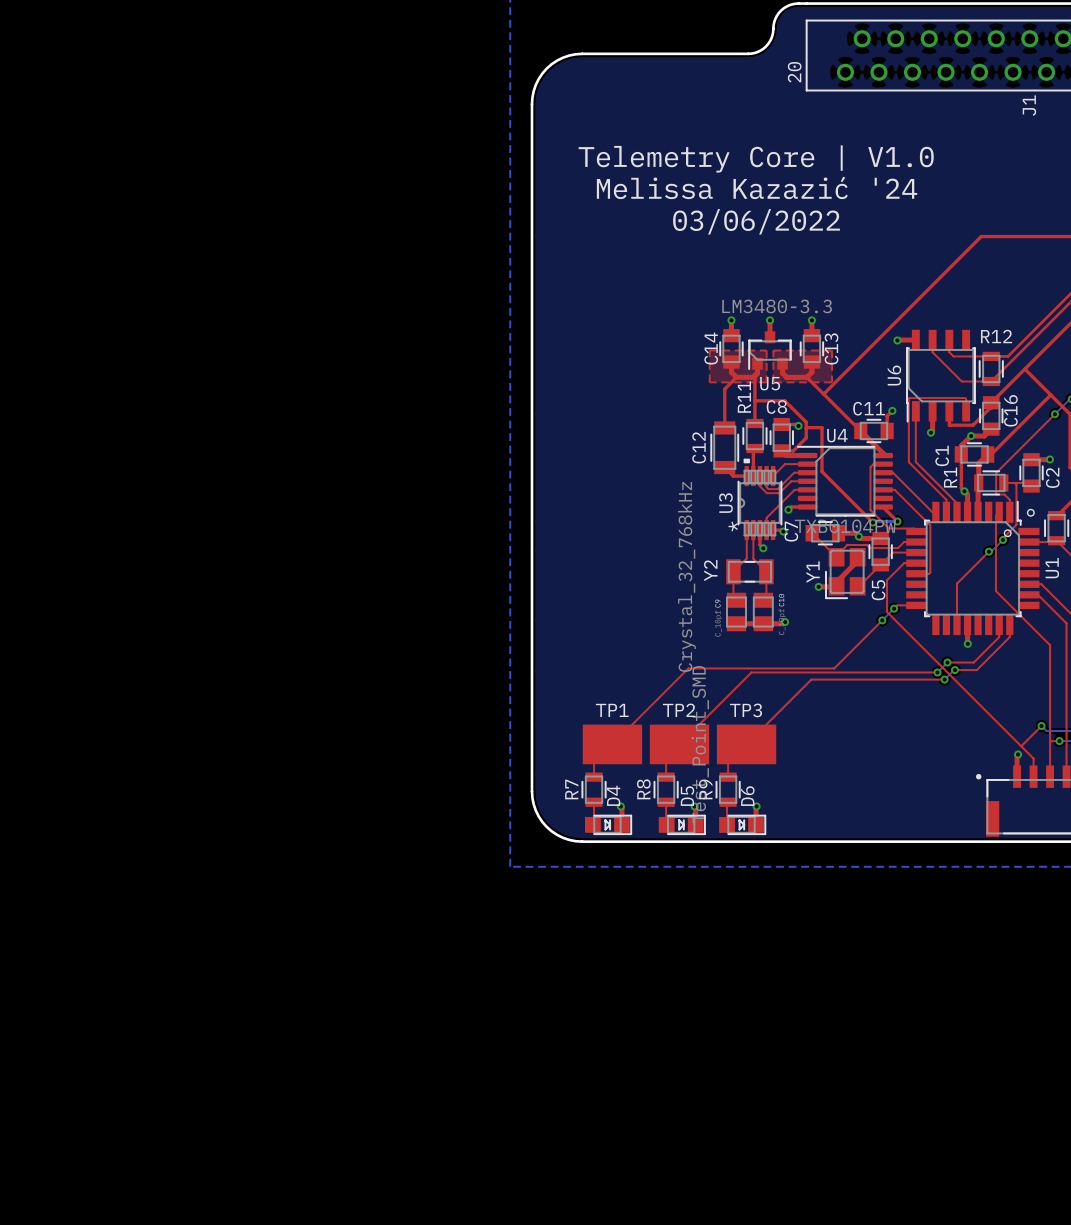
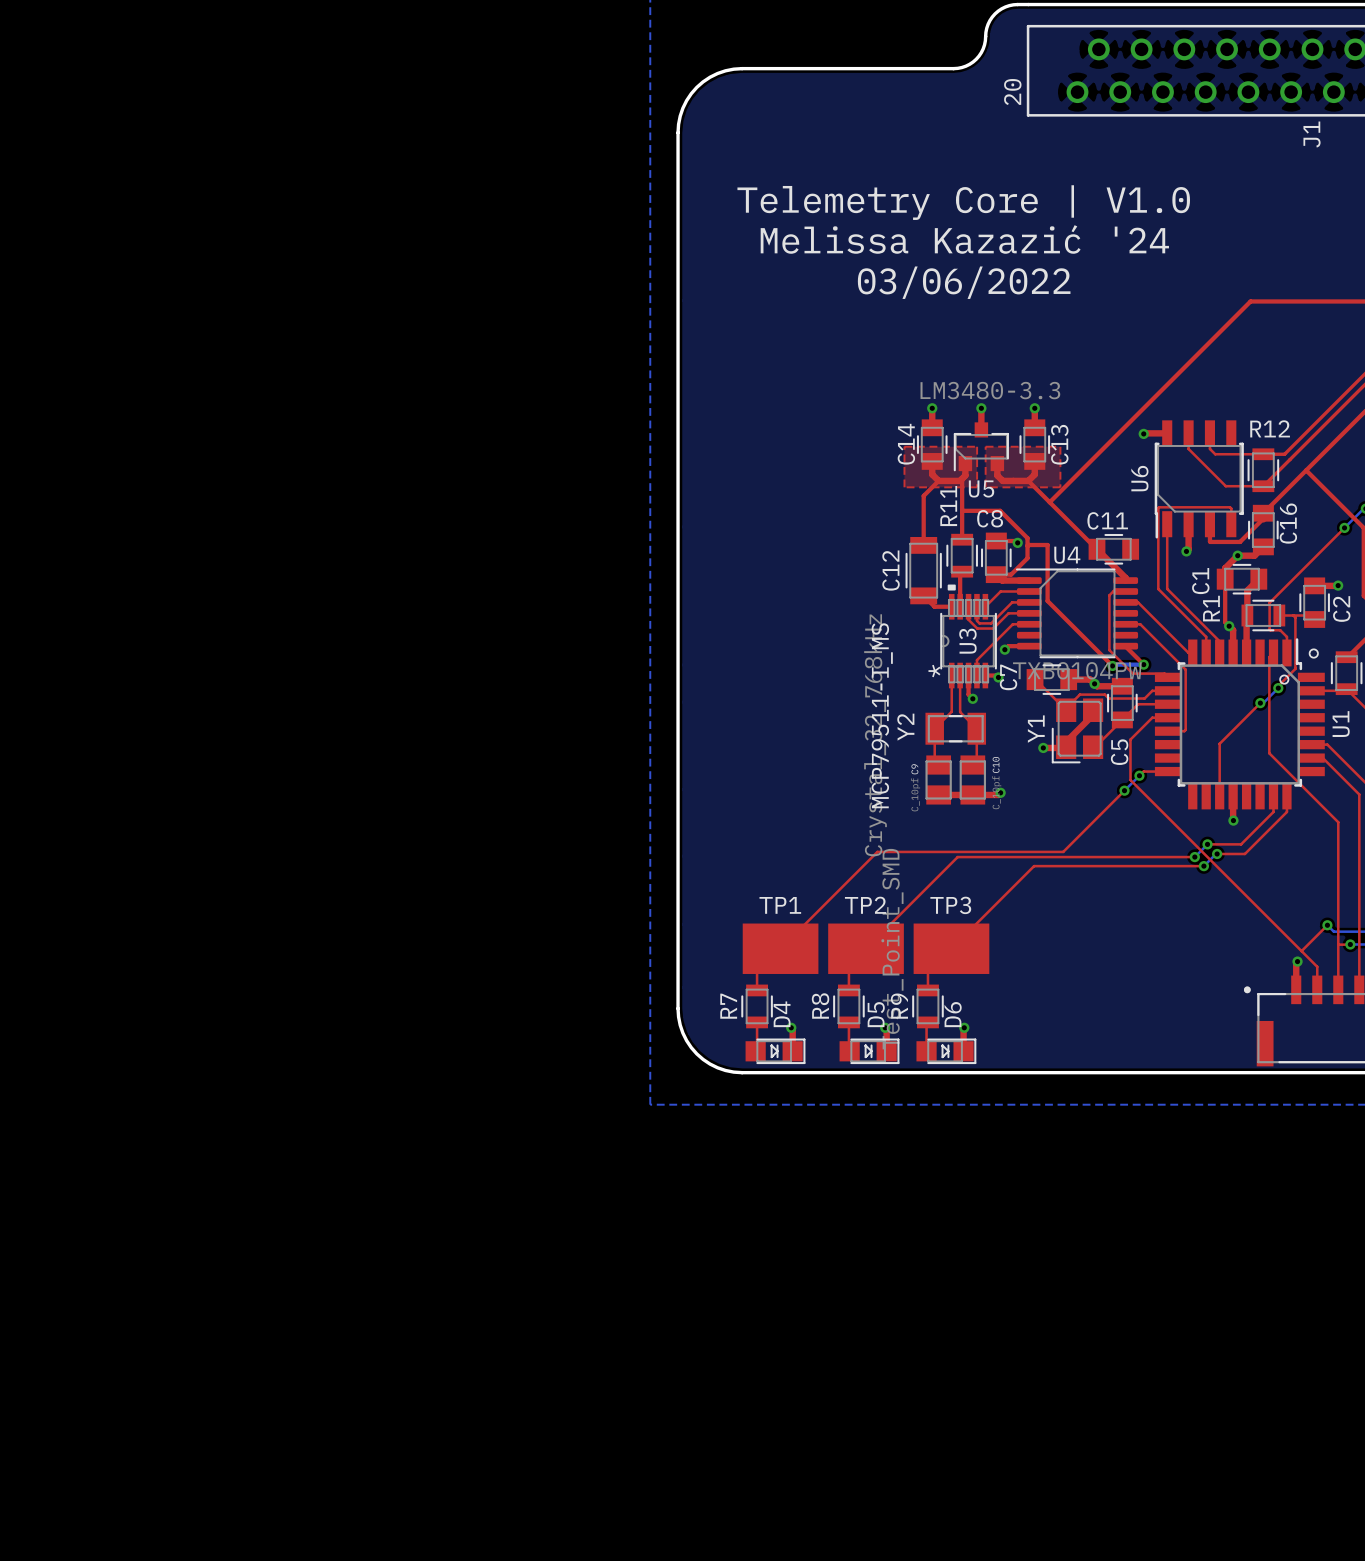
top track: (1050, 394) (991, 454) (987, 454) -> none
top track: (892, 410) (887, 416) (887, 430) -> none
via: (892, 410) -> none
U3 name position: U3 (725, 503) -> U3 (967, 641)
U3 value: none -> MCP79511-I_MS (882, 715)

